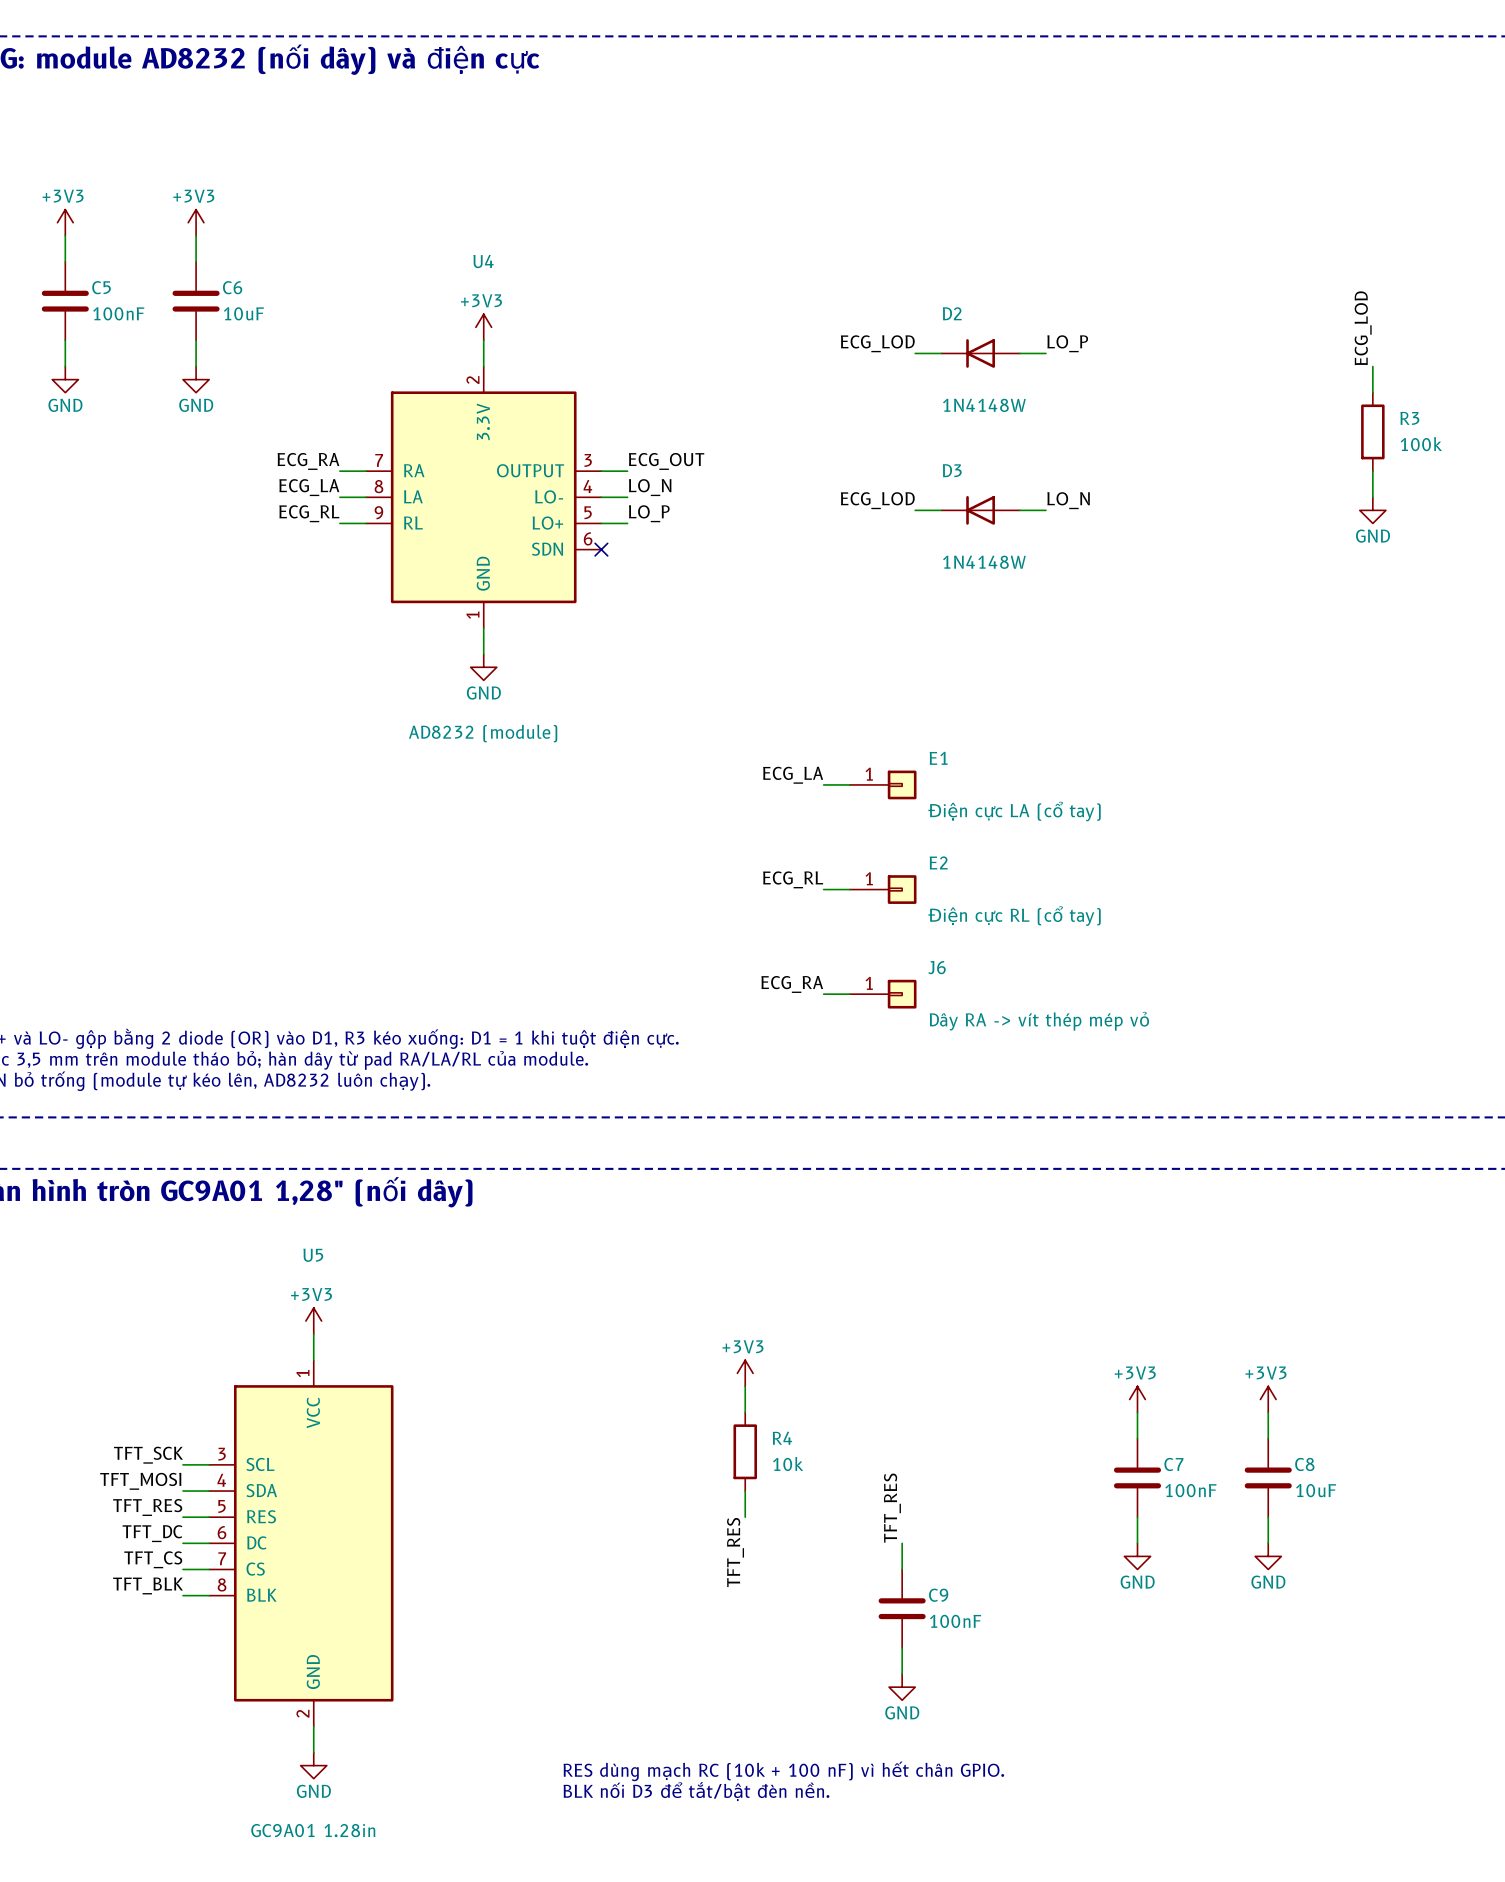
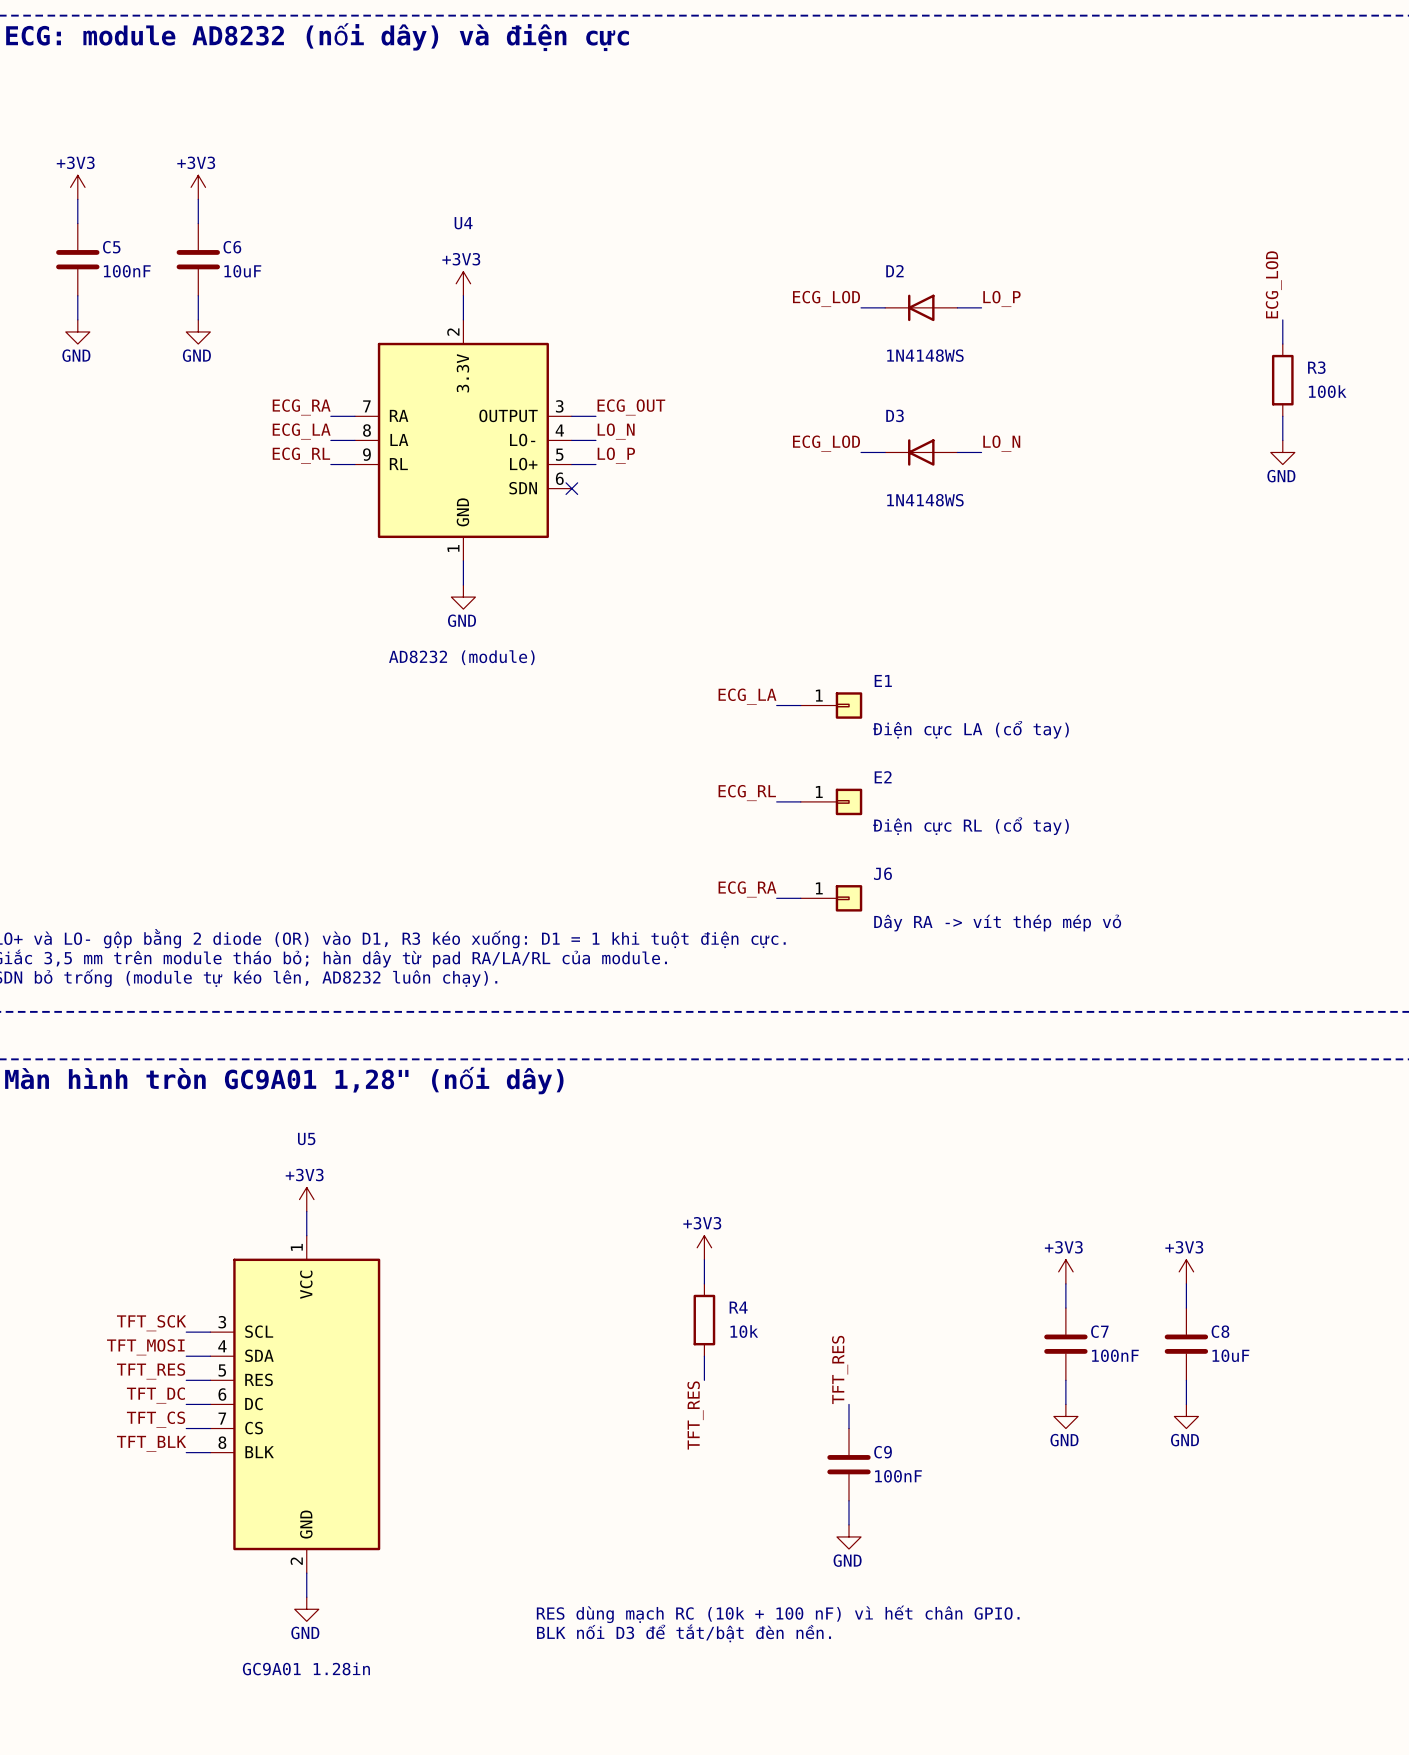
D2 value: 1N4148W (984, 405) -> 1N4148WS (925, 355)
D3 value: 1N4148W (984, 562) -> 1N4148WS (925, 500)

